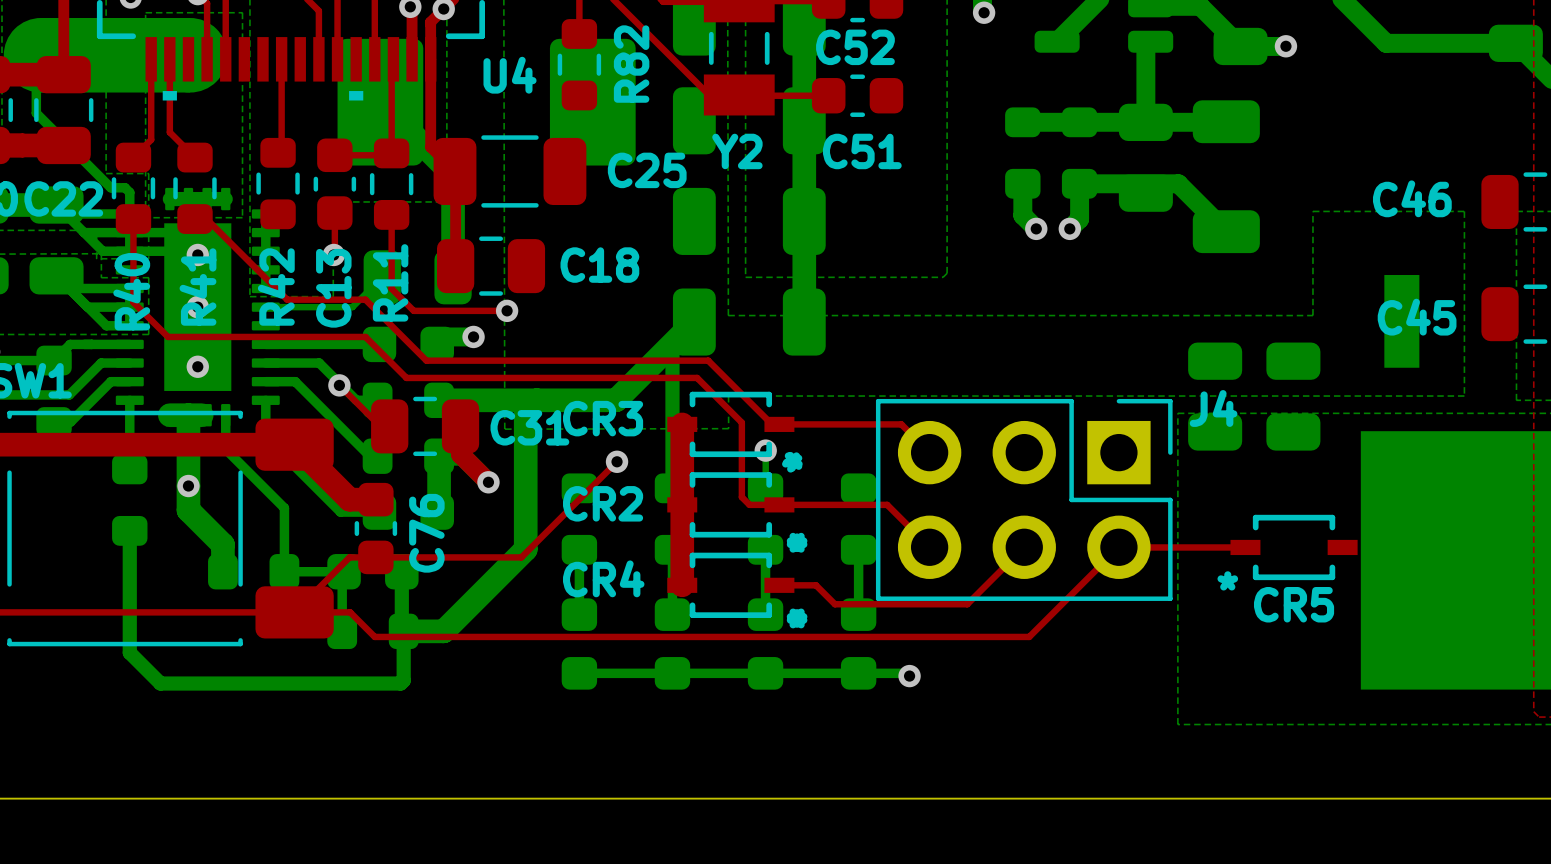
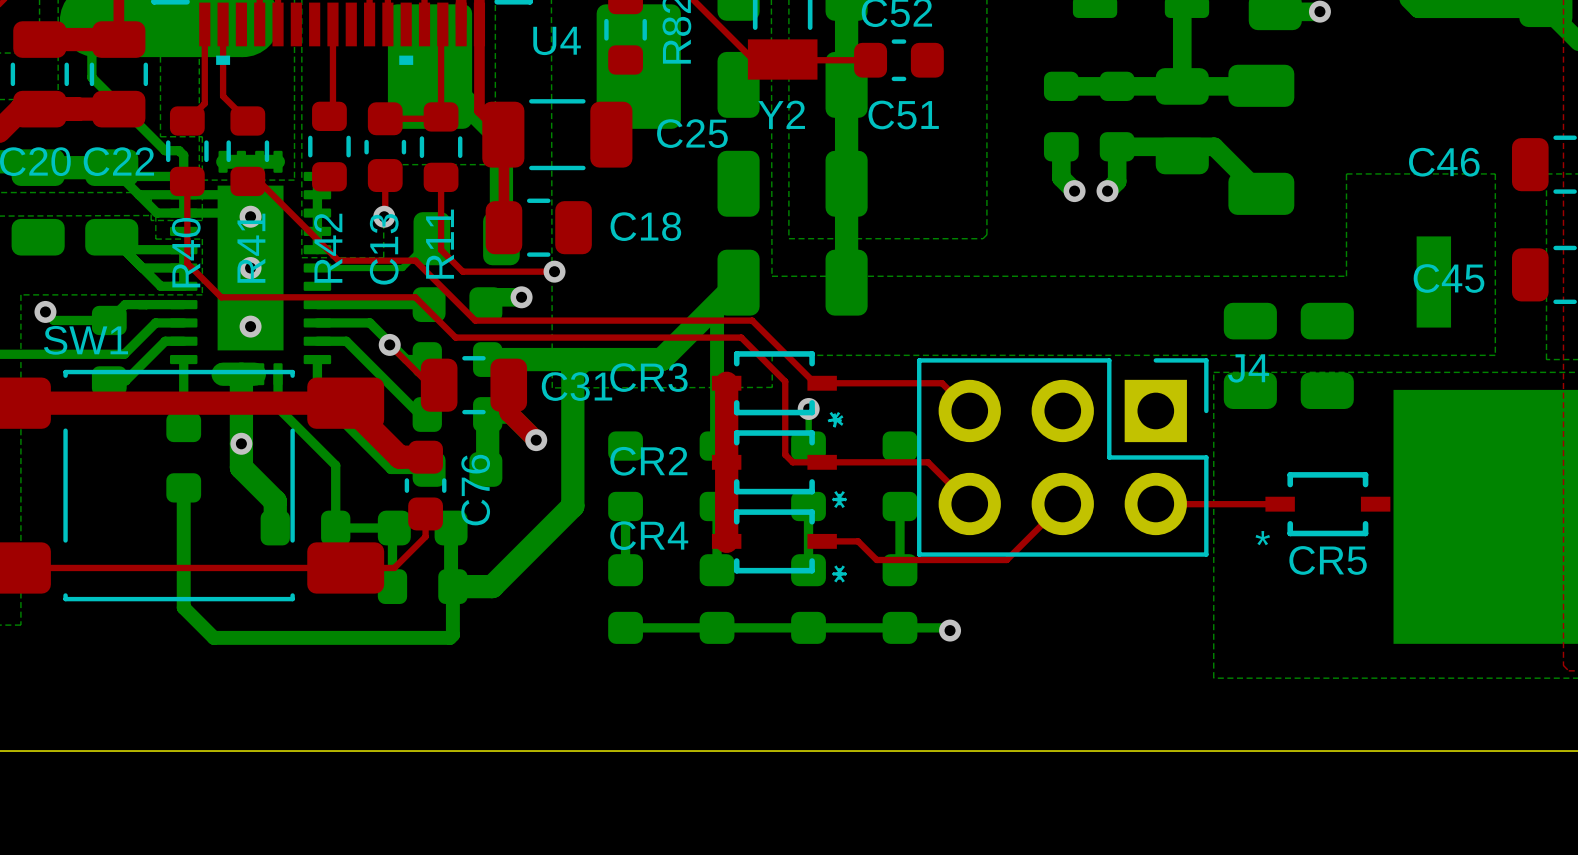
top track: (617, 461) (521, 557) (349, 557) (294, 612) -> none
via: (617, 461) -> none
top track: (1118, 547) (1029, 636) (374, 636) (350, 612) (344, 612) -> (425, 513) (425, 536) (394, 567)

